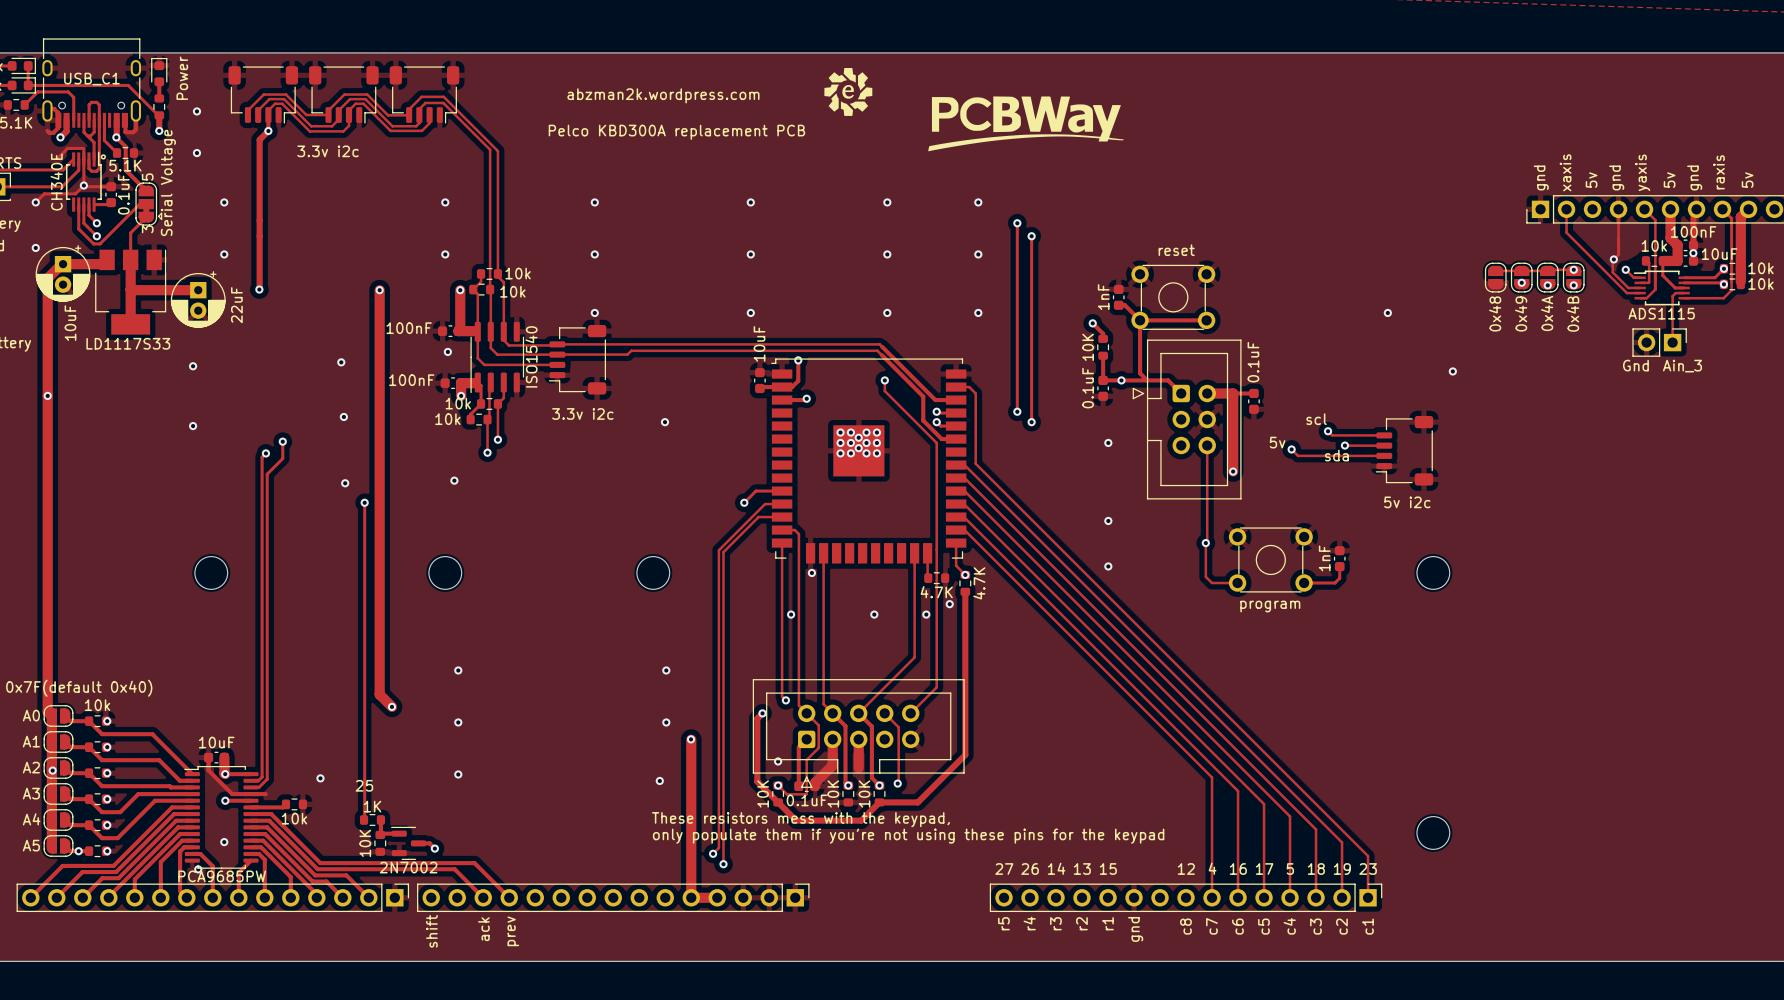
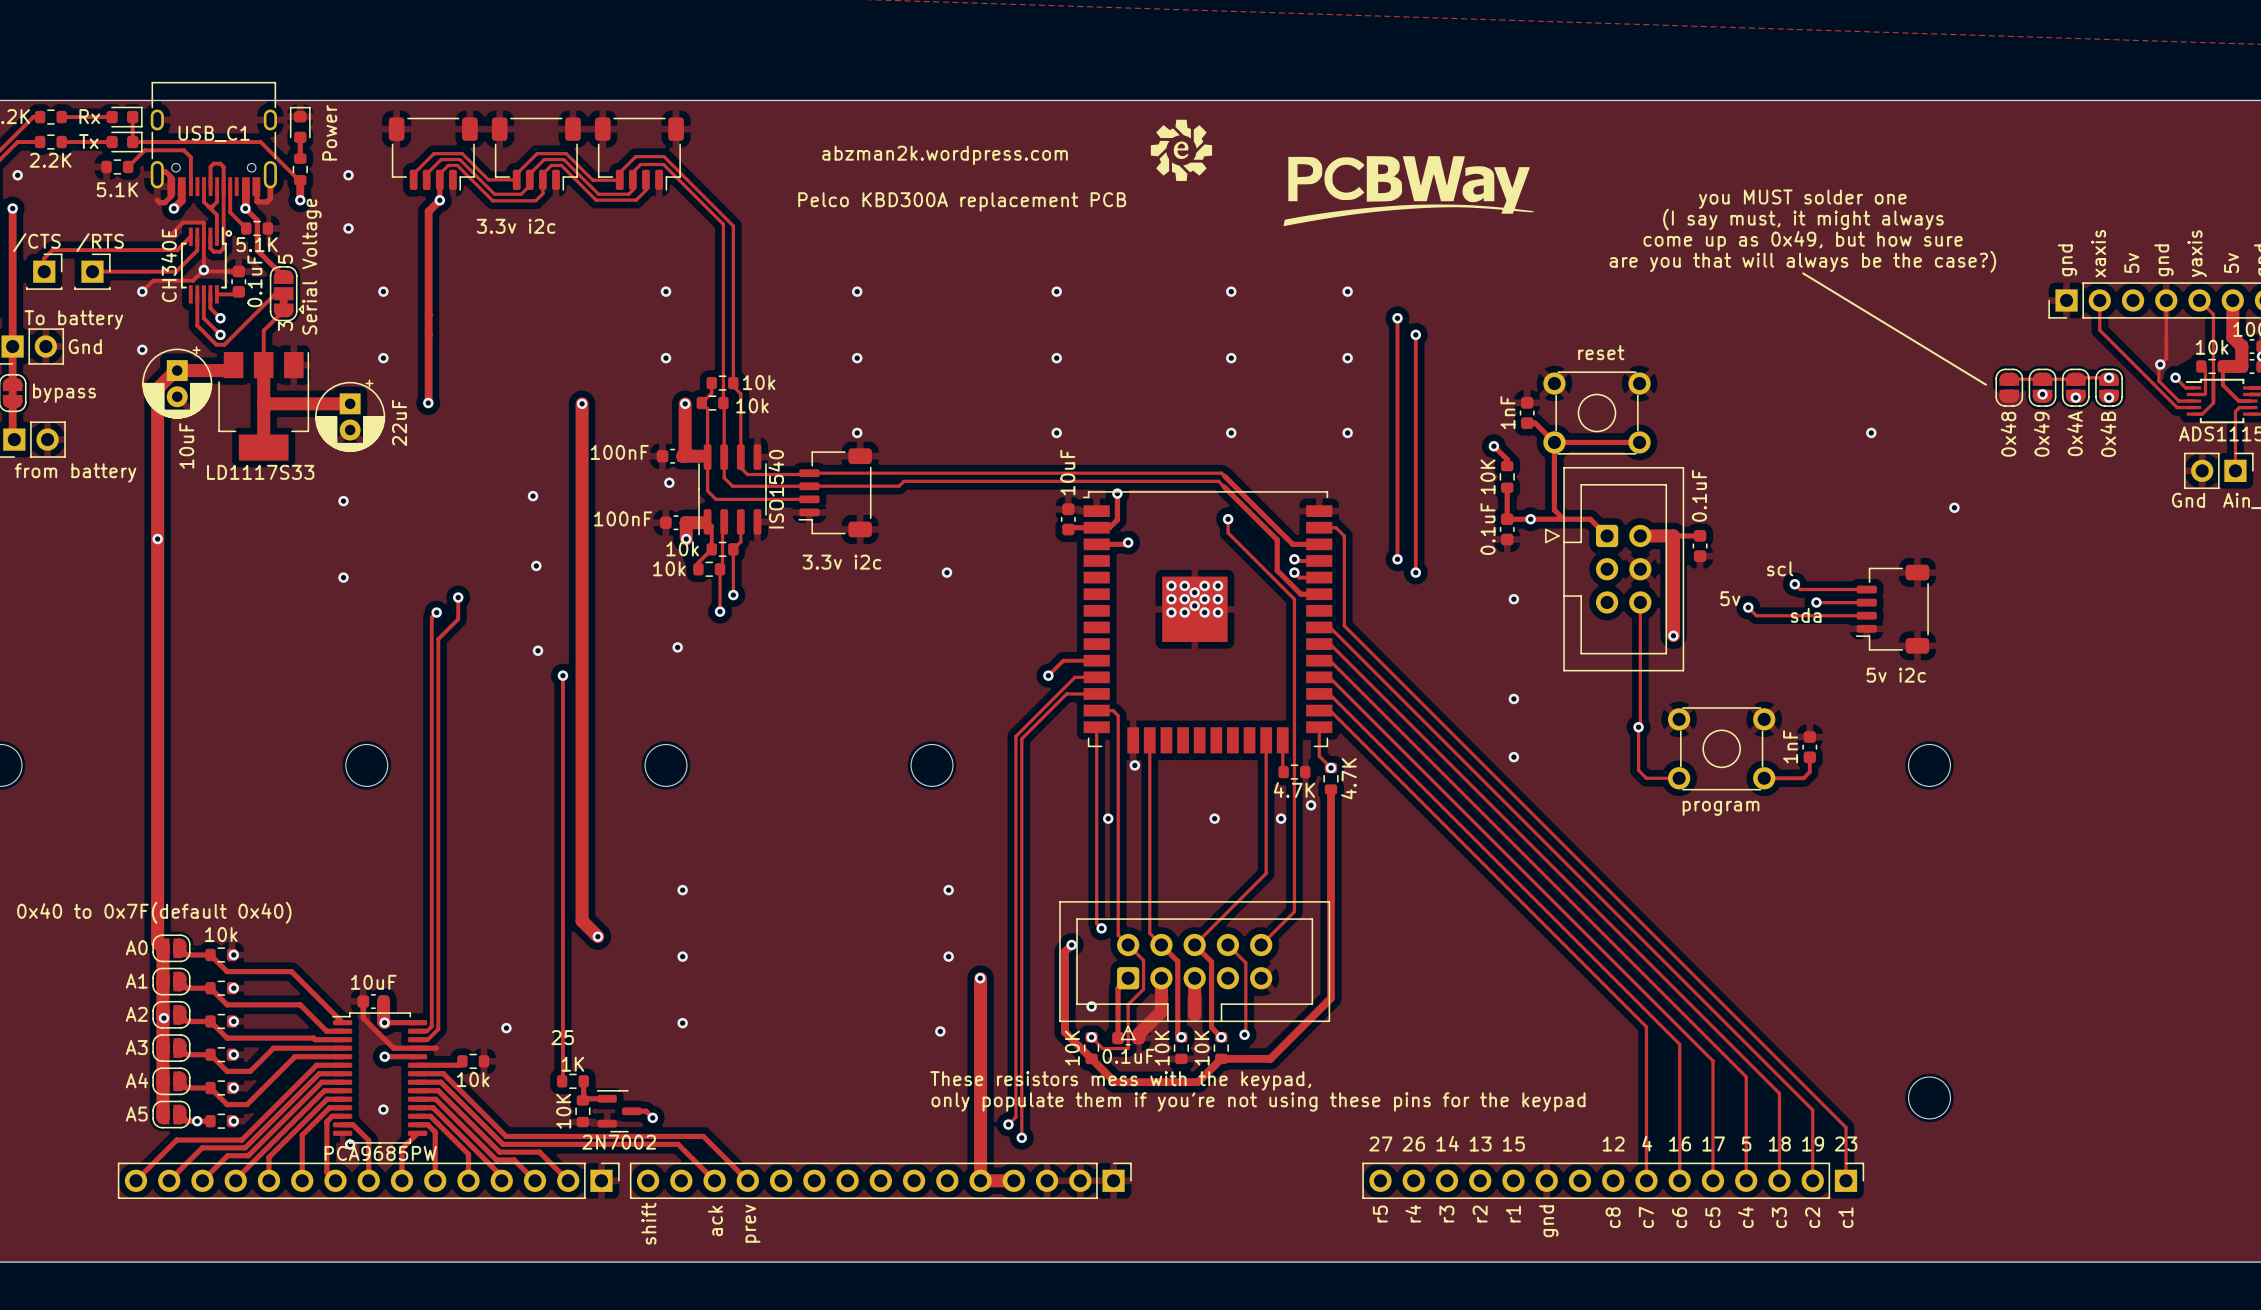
text: none -> you MUST solder one (1802, 199)
text: none -> (I say must, it might always (1803, 219)
text: none -> come up as 0x49, but how sure (1803, 241)
text: none -> are you that will always be the case?) (1802, 261)
line: none -> (1803, 273) (1986, 384)

